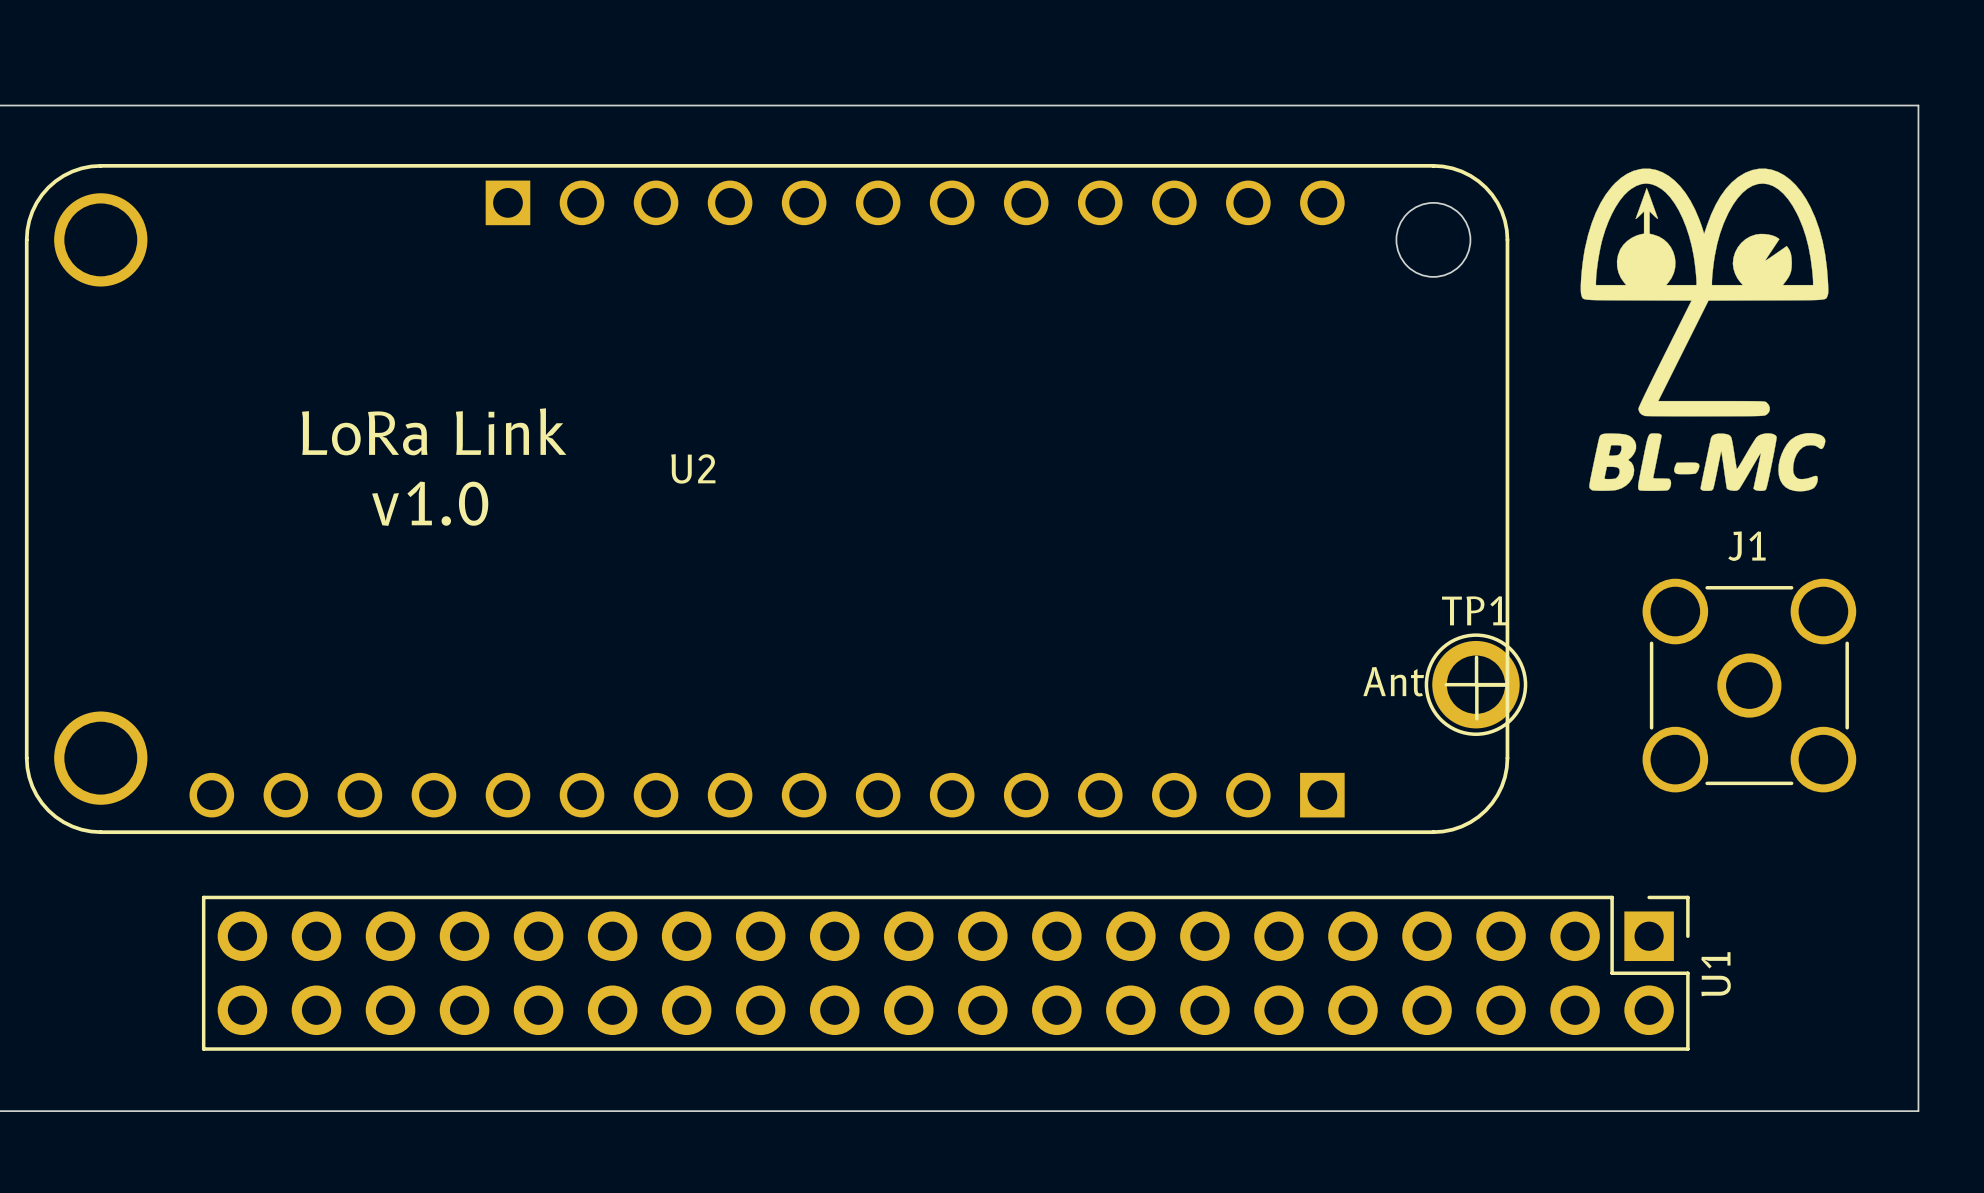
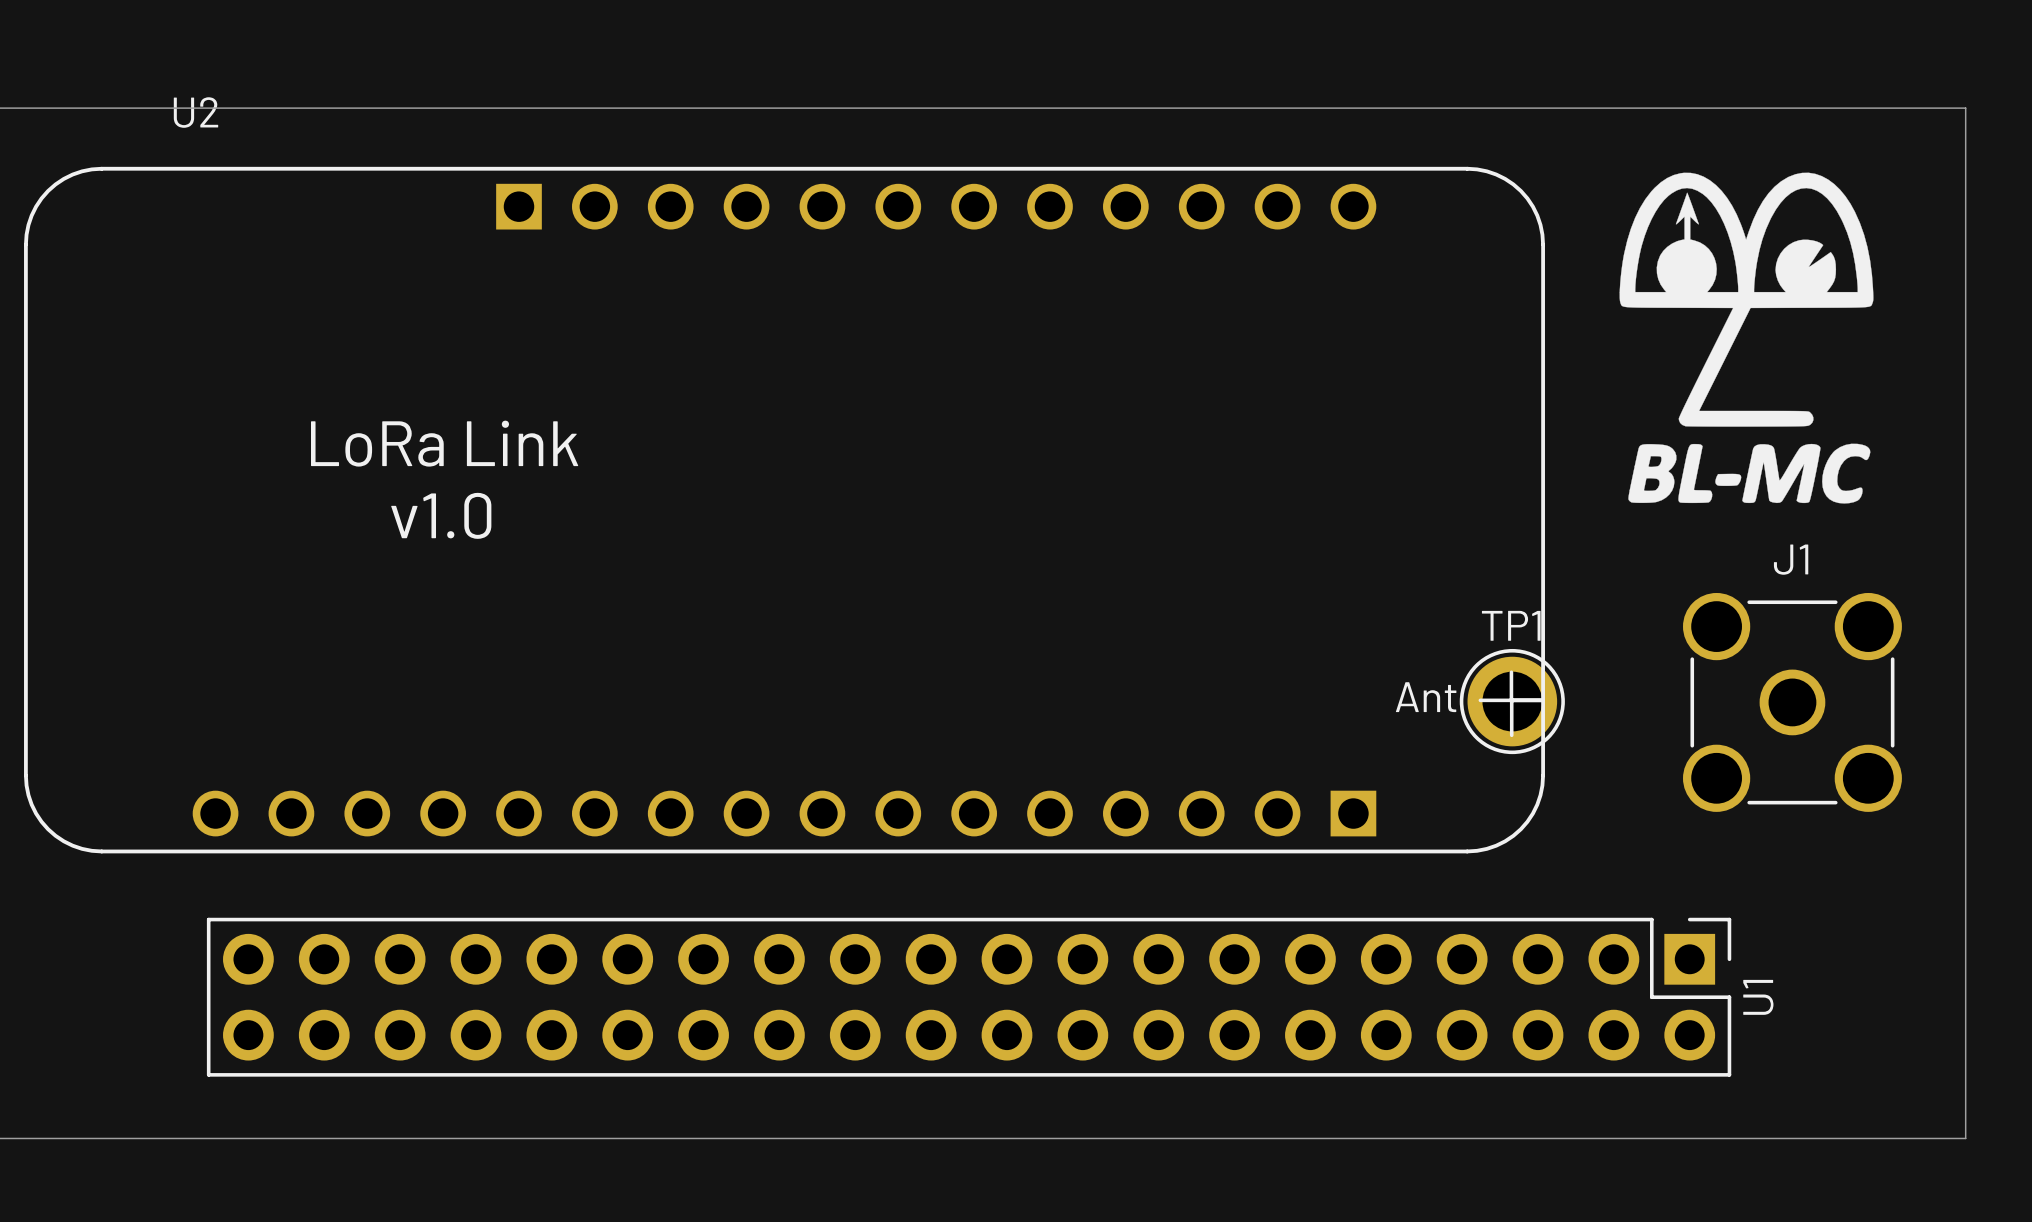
U2 footprint: [24, 164, 1510, 835] -> [24, 166, 1545, 854]
U2 name position: U2 (693, 468) -> U2 (195, 112)

